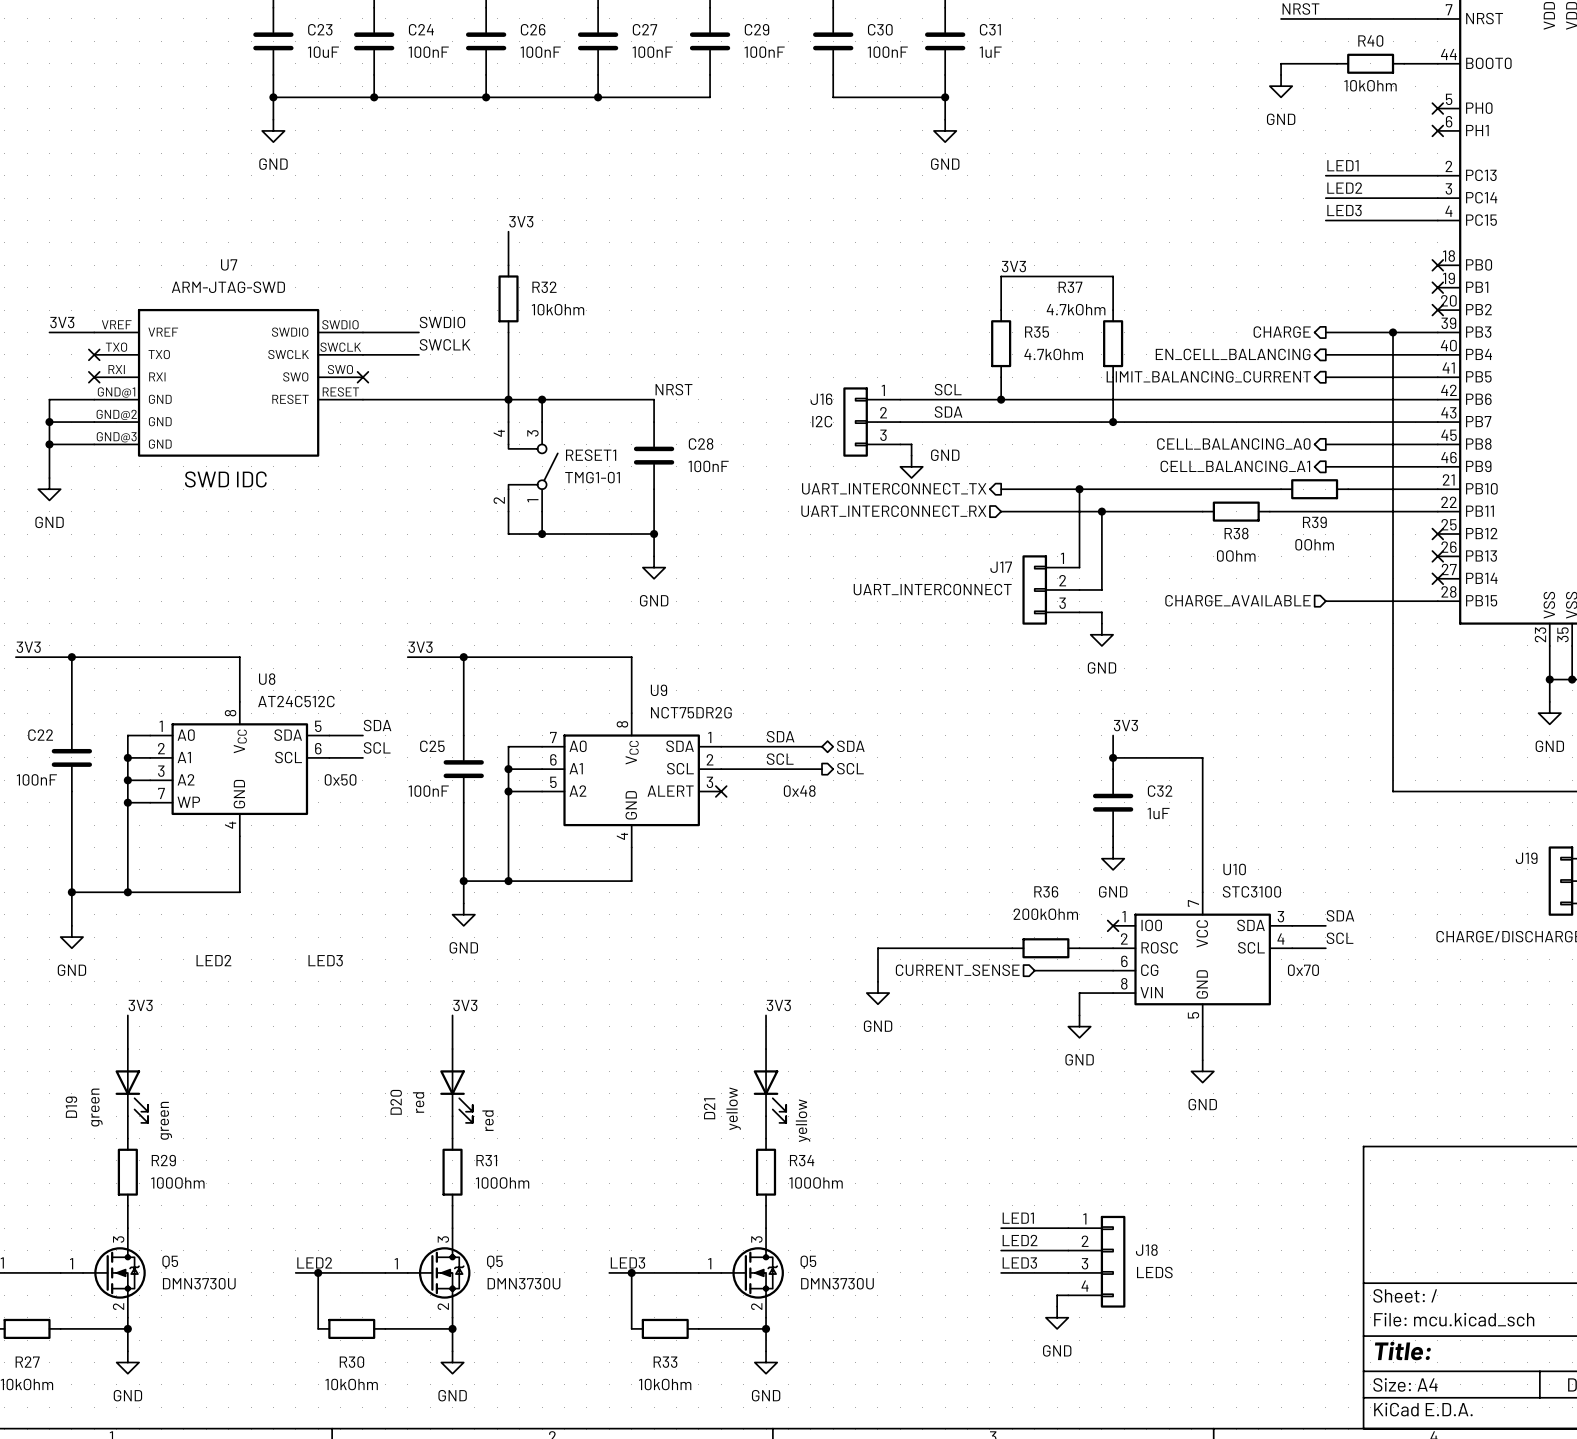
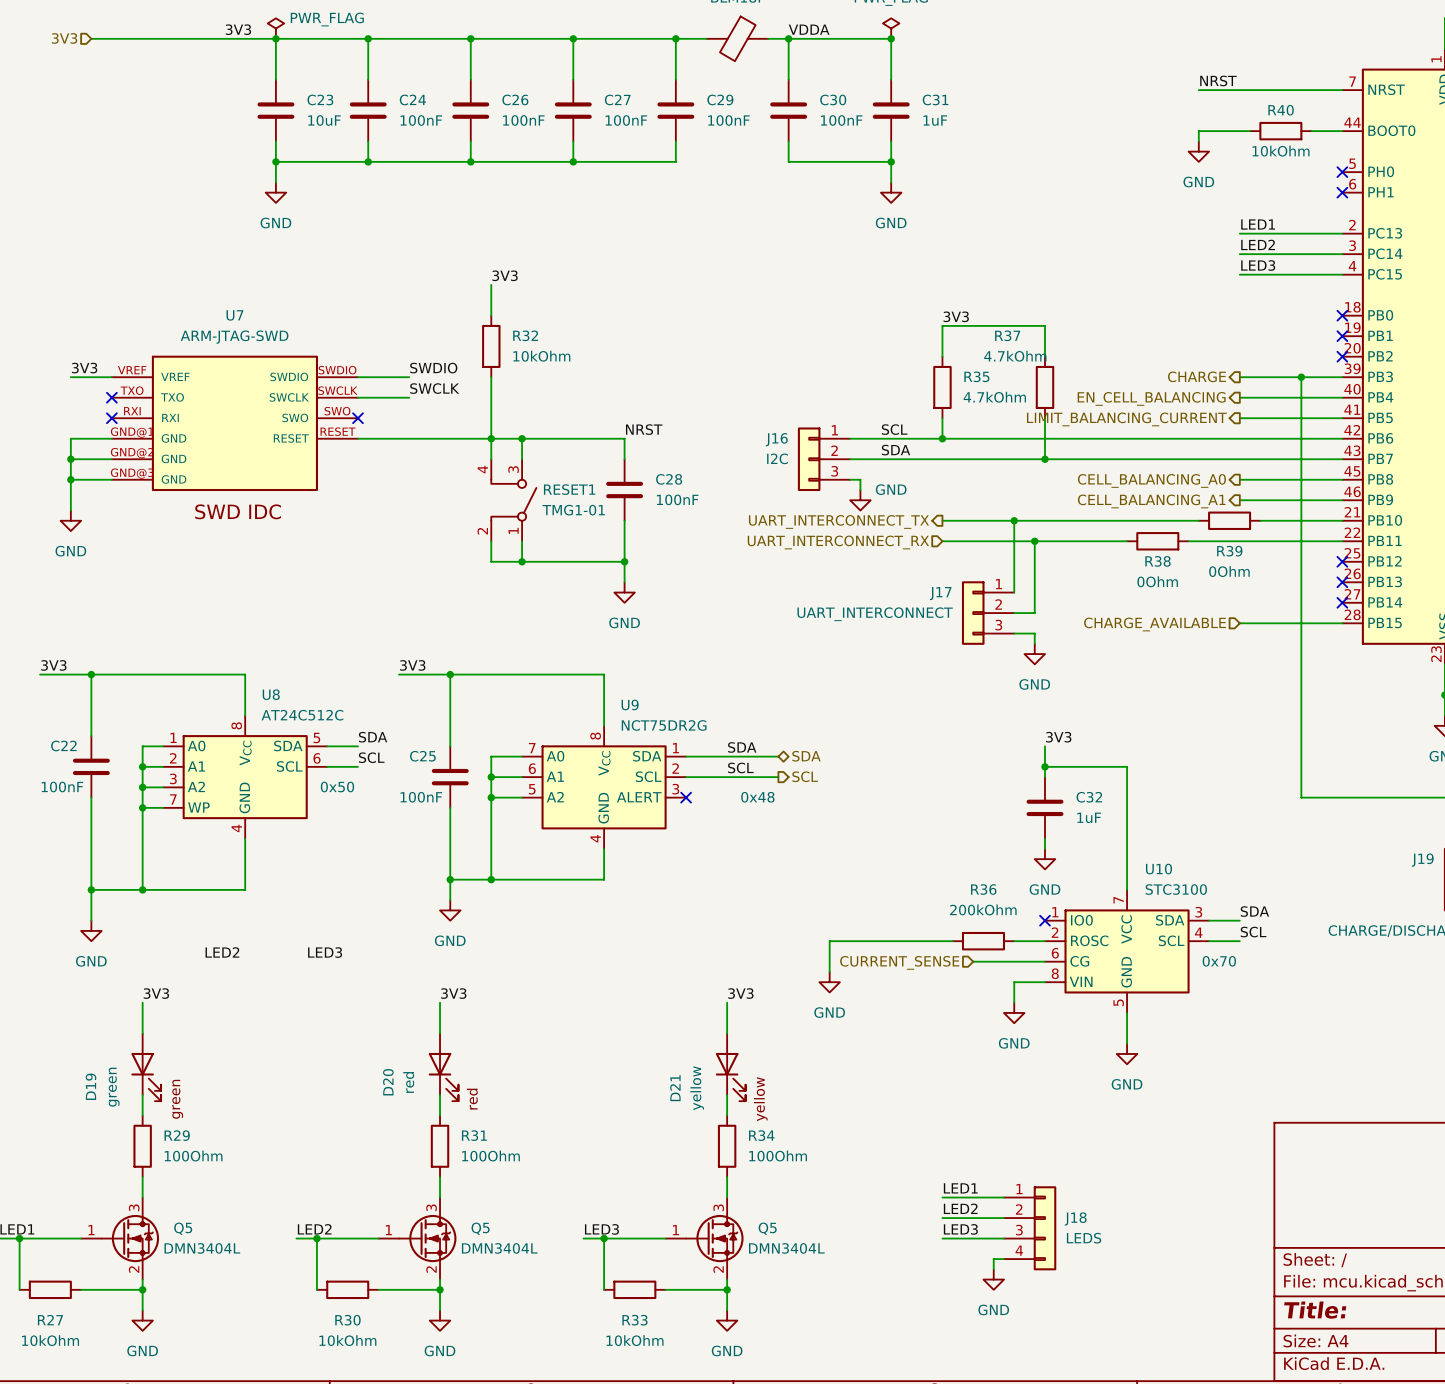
Q5 value: DMN3730U (199, 1283) -> DMN3404L (202, 1248)
Q5 value: DMN3730U (523, 1283) -> DMN3404L (499, 1248)
Q5 value: DMN3730U (837, 1283) -> DMN3404L (786, 1248)

